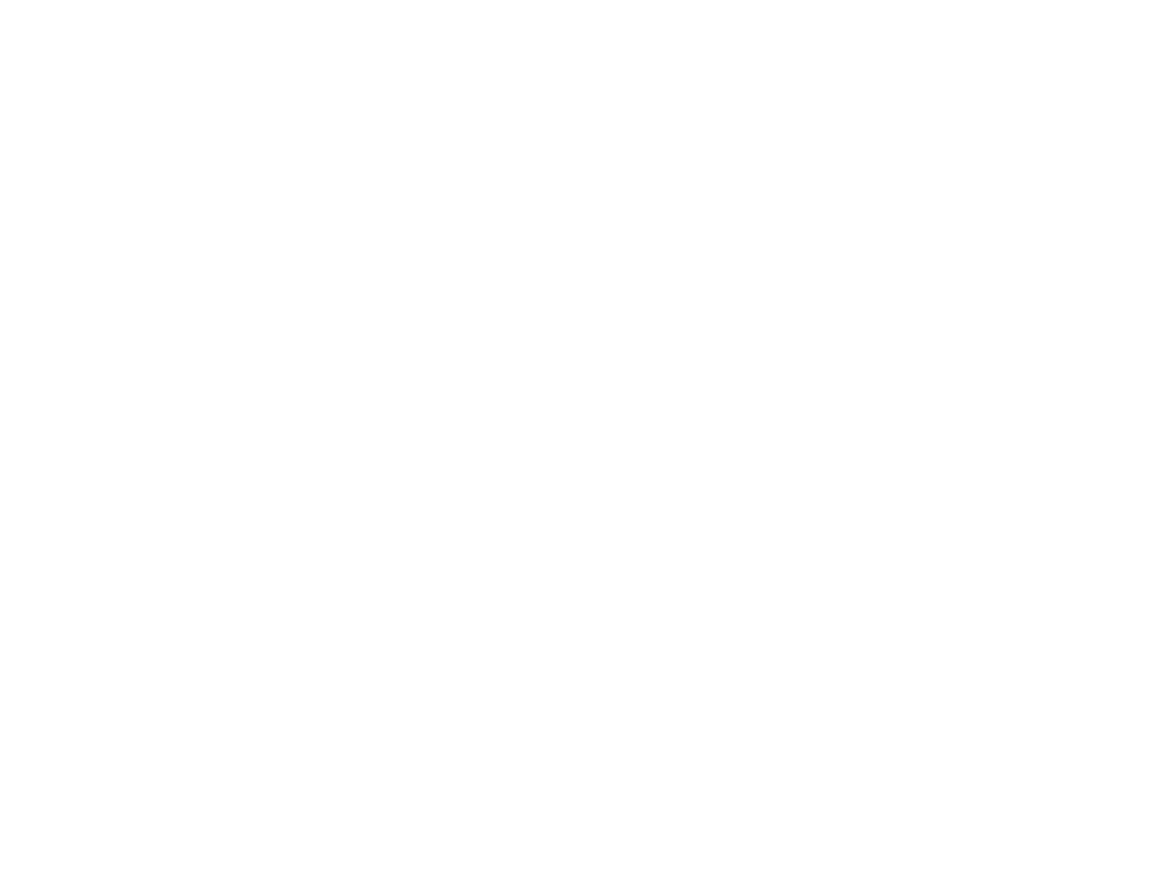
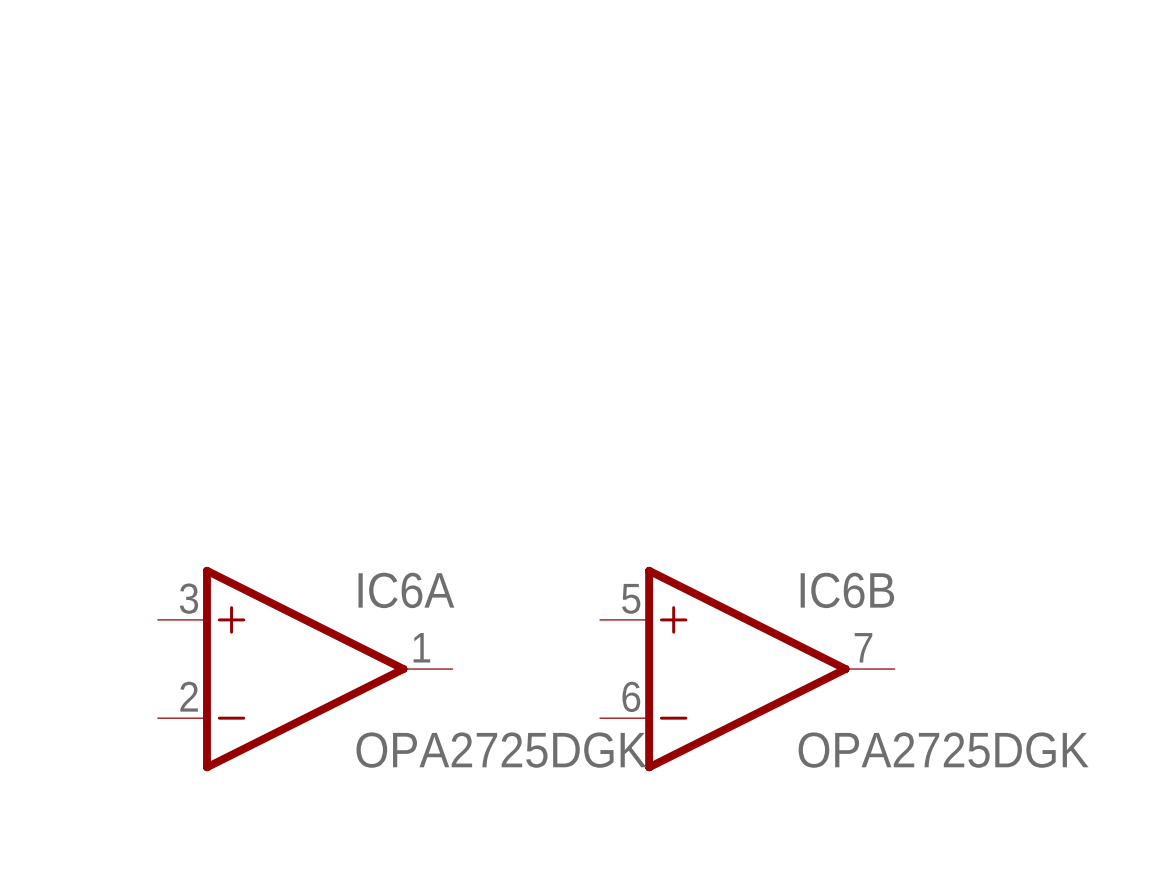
IC6A: none -> OPA2725DGK (305, 669)
IC6B: none -> OPA2725DGK (747, 669)

